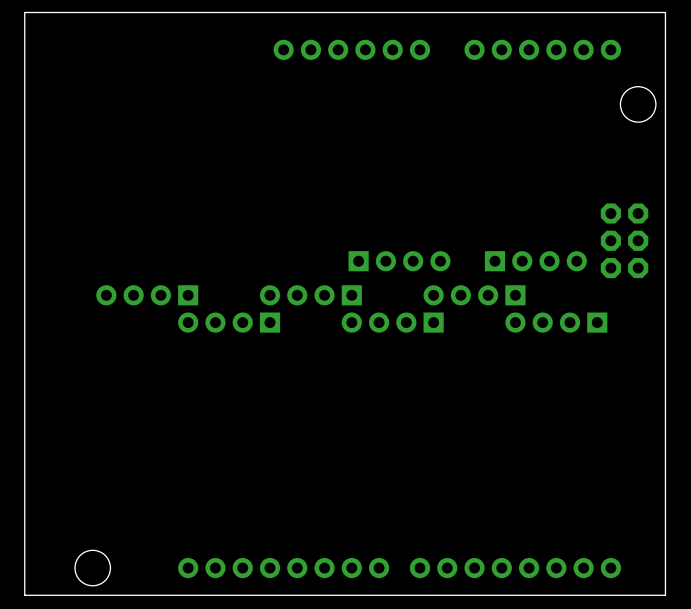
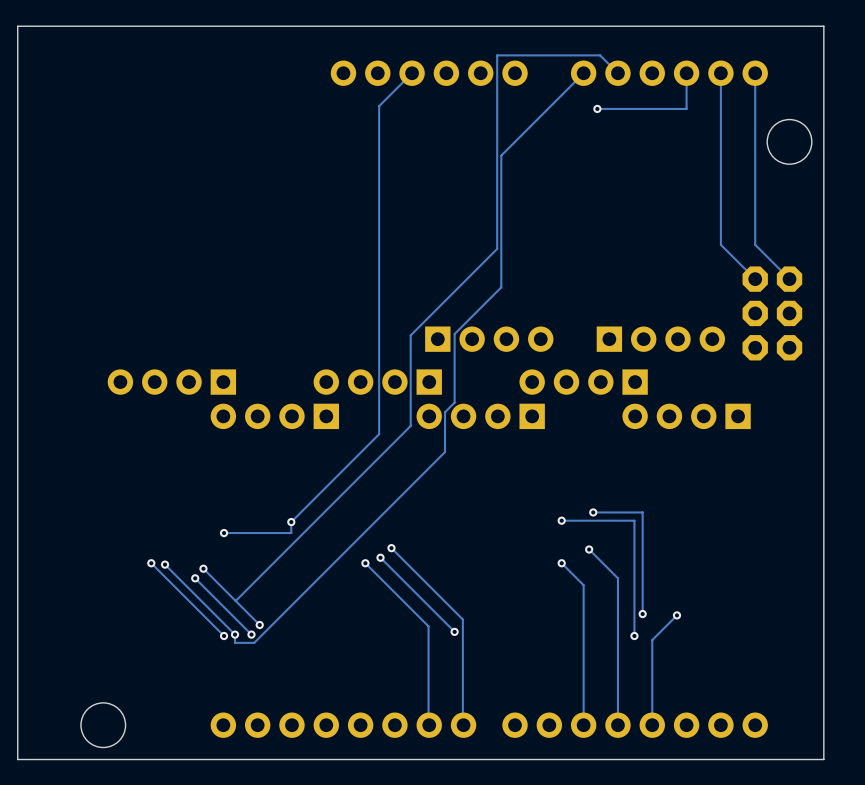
track: none -> (412, 73) (379, 106) (379, 434) (291, 522) (291, 533) (224, 533)
track: none -> (583, 73) (501, 155) (501, 287) (454, 334) (454, 402) (445, 412) (445, 452) (254, 642) (235, 642) (235, 634) (165, 564)
track: none -> (617, 73) (600, 55) (497, 55) (497, 248) (410, 335) (410, 425) (235, 600)
track: none -> (686, 73) (686, 108) (597, 108)
track: none -> (720, 73) (720, 244) (755, 279)
track: none -> (755, 73) (755, 244) (789, 279)
via: none -> (597, 108)
track: none -> (593, 512) (642, 512) (642, 614)
via: none -> (593, 512)
track: none -> (561, 520) (634, 520) (634, 635)
via: none -> (561, 520)
via: none -> (291, 522)
via: none -> (224, 533)
track: none -> (391, 548) (462, 619) (463, 725)
via: none -> (391, 548)
track: none -> (589, 549) (617, 578) (617, 725)
via: none -> (589, 549)
track: none -> (380, 557) (454, 631)
via: none -> (380, 557)
track: none -> (151, 563) (224, 635)
via: none -> (151, 563)
track: none -> (365, 563) (428, 626) (429, 725)
via: none -> (365, 563)
track: none -> (561, 563) (583, 585) (583, 725)
via: none -> (561, 563)
via: none -> (165, 564)
track: none -> (203, 568) (259, 625)
via: none -> (203, 568)
track: none -> (195, 578) (251, 634)
via: none -> (195, 578)
via: none -> (642, 614)
track: none -> (676, 615) (652, 640) (652, 725)
via: none -> (676, 615)
via: none -> (259, 625)
via: none -> (454, 631)
via: none -> (235, 634)
via: none -> (251, 634)
via: none -> (224, 635)
via: none -> (634, 635)

